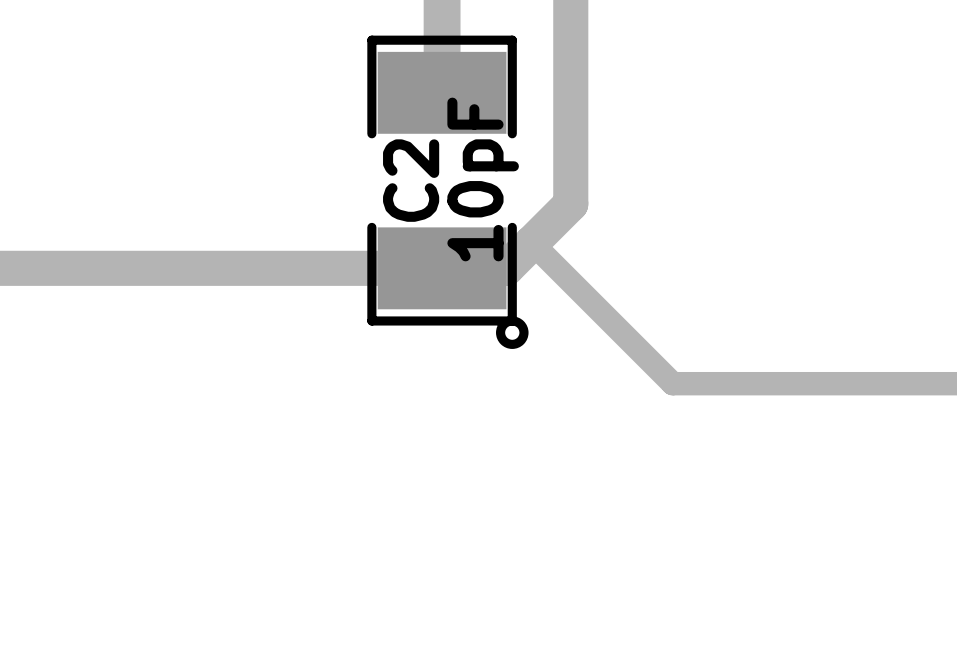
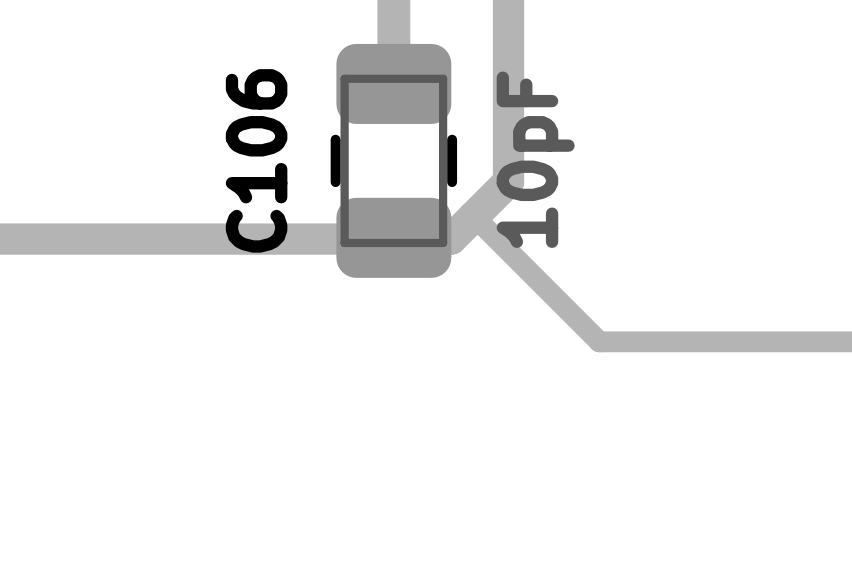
C106: none -> 10pF (393, 160)
C2: 10pF (447, 192) -> none

